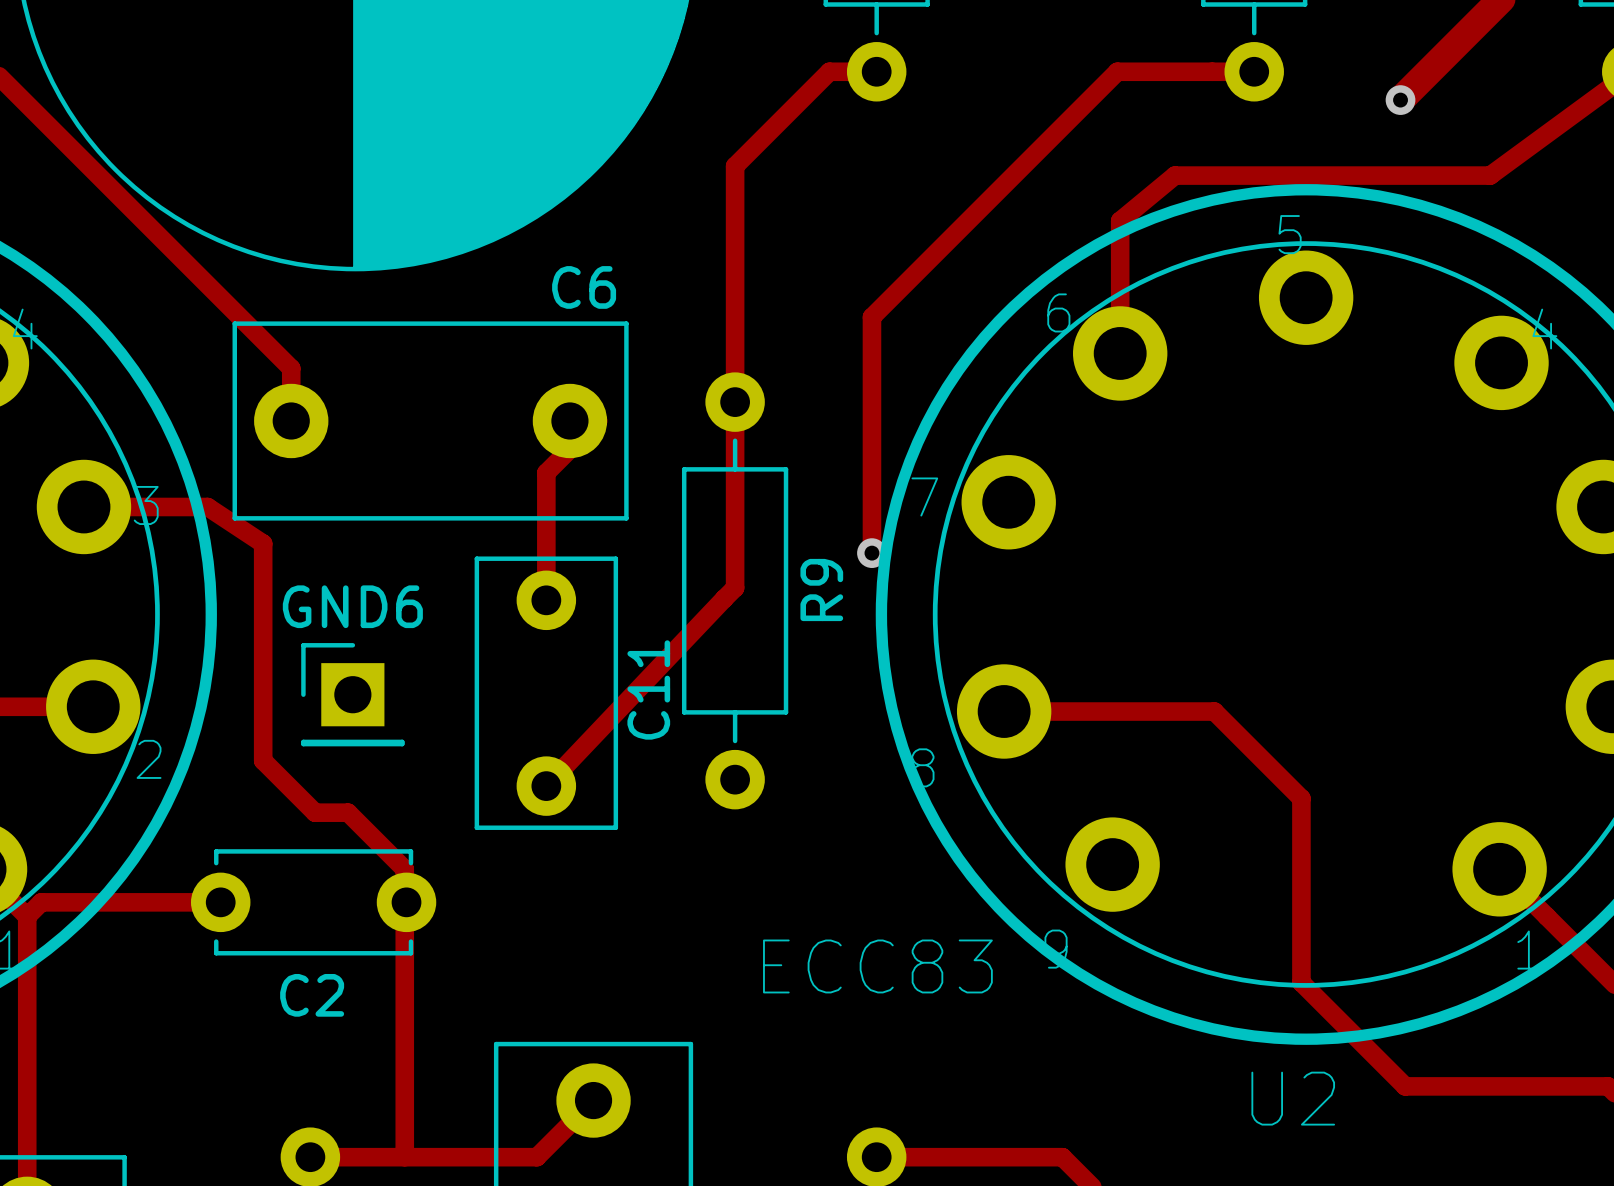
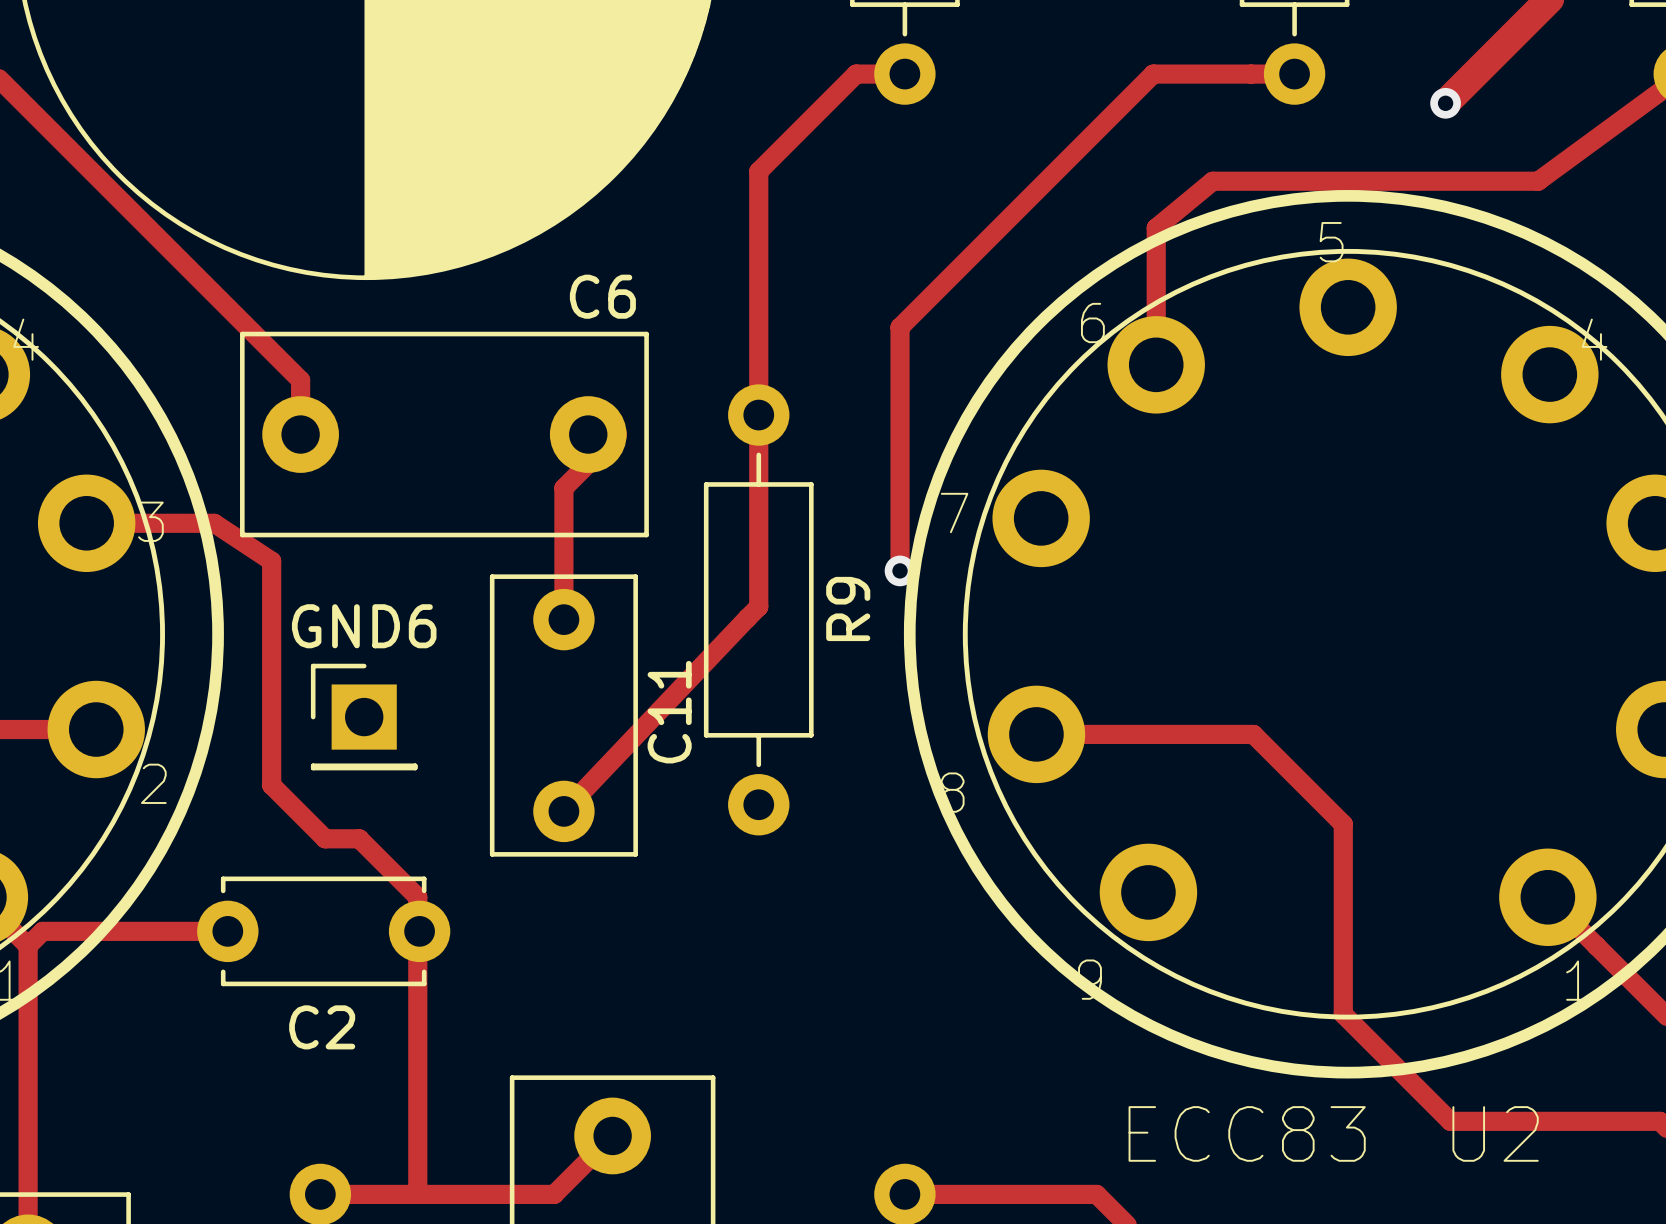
U2 value position: ECC83 (877, 966) -> ECC83 (1247, 1133)
U2 name position: U2 (1293, 1098) -> U2 (1495, 1133)

